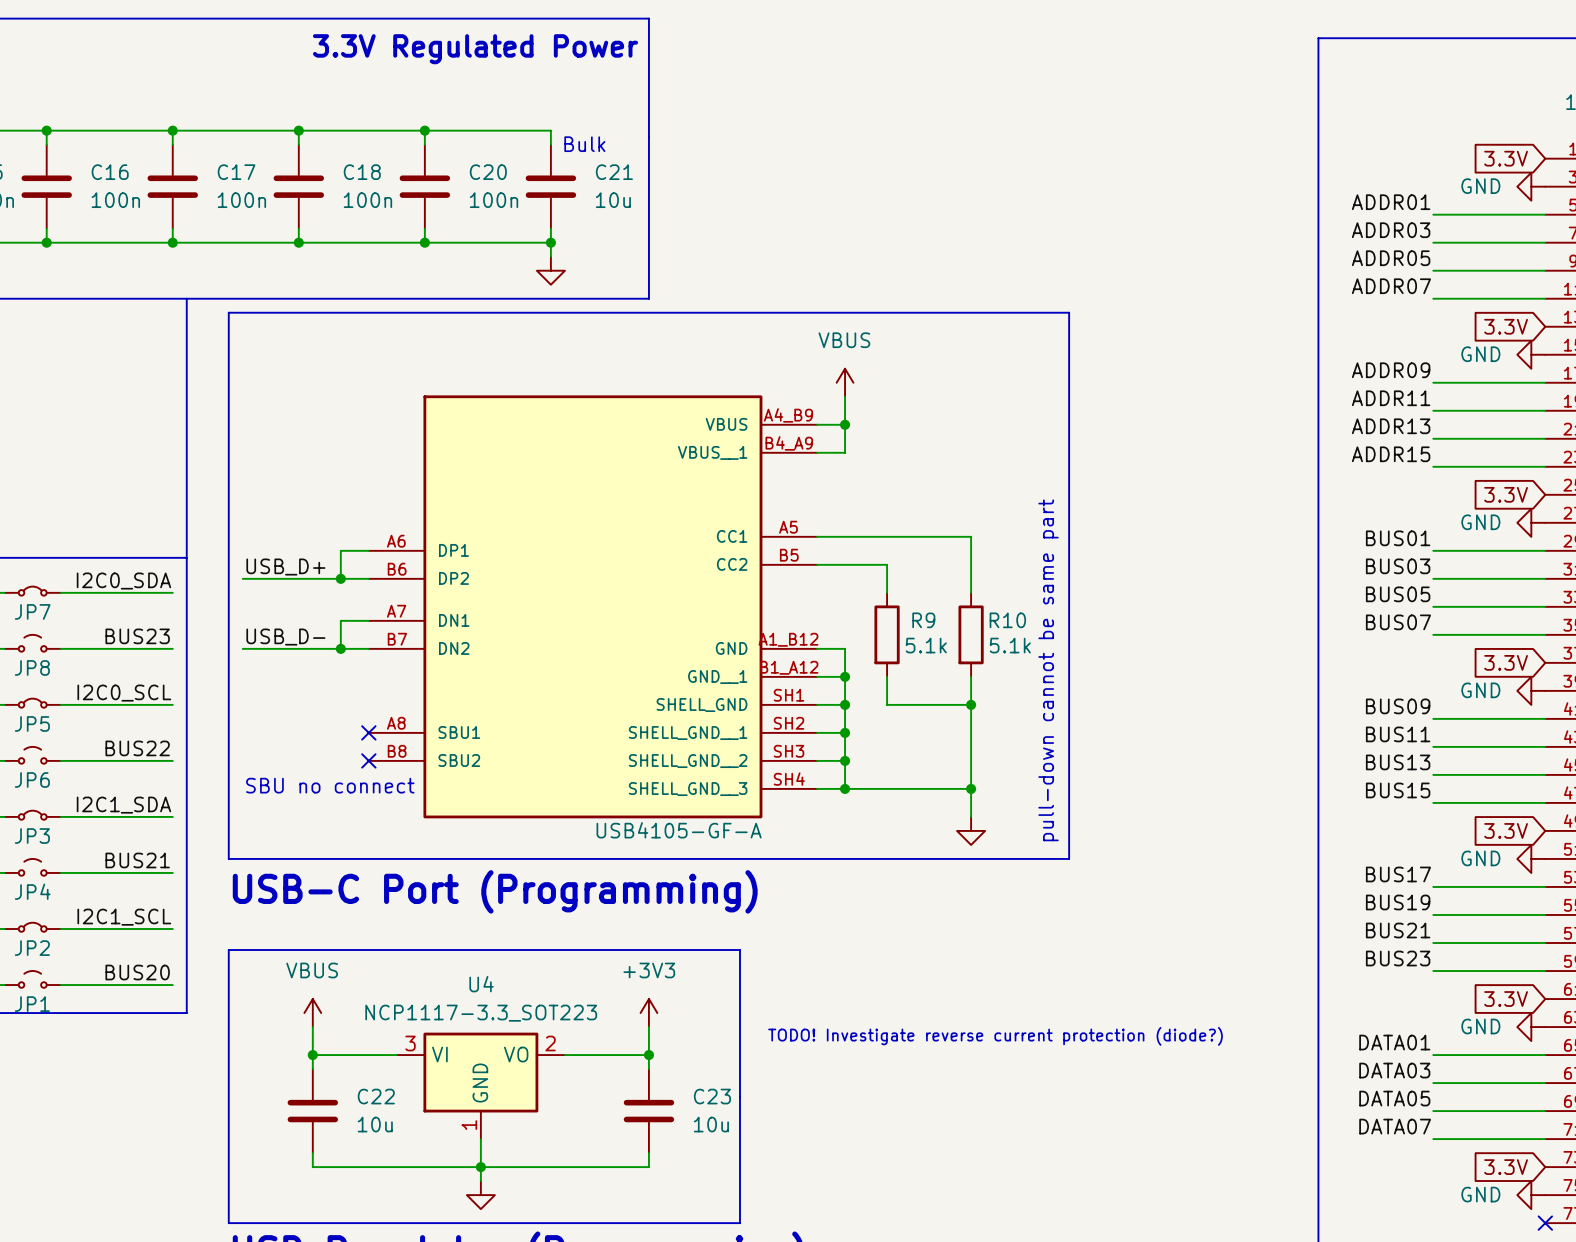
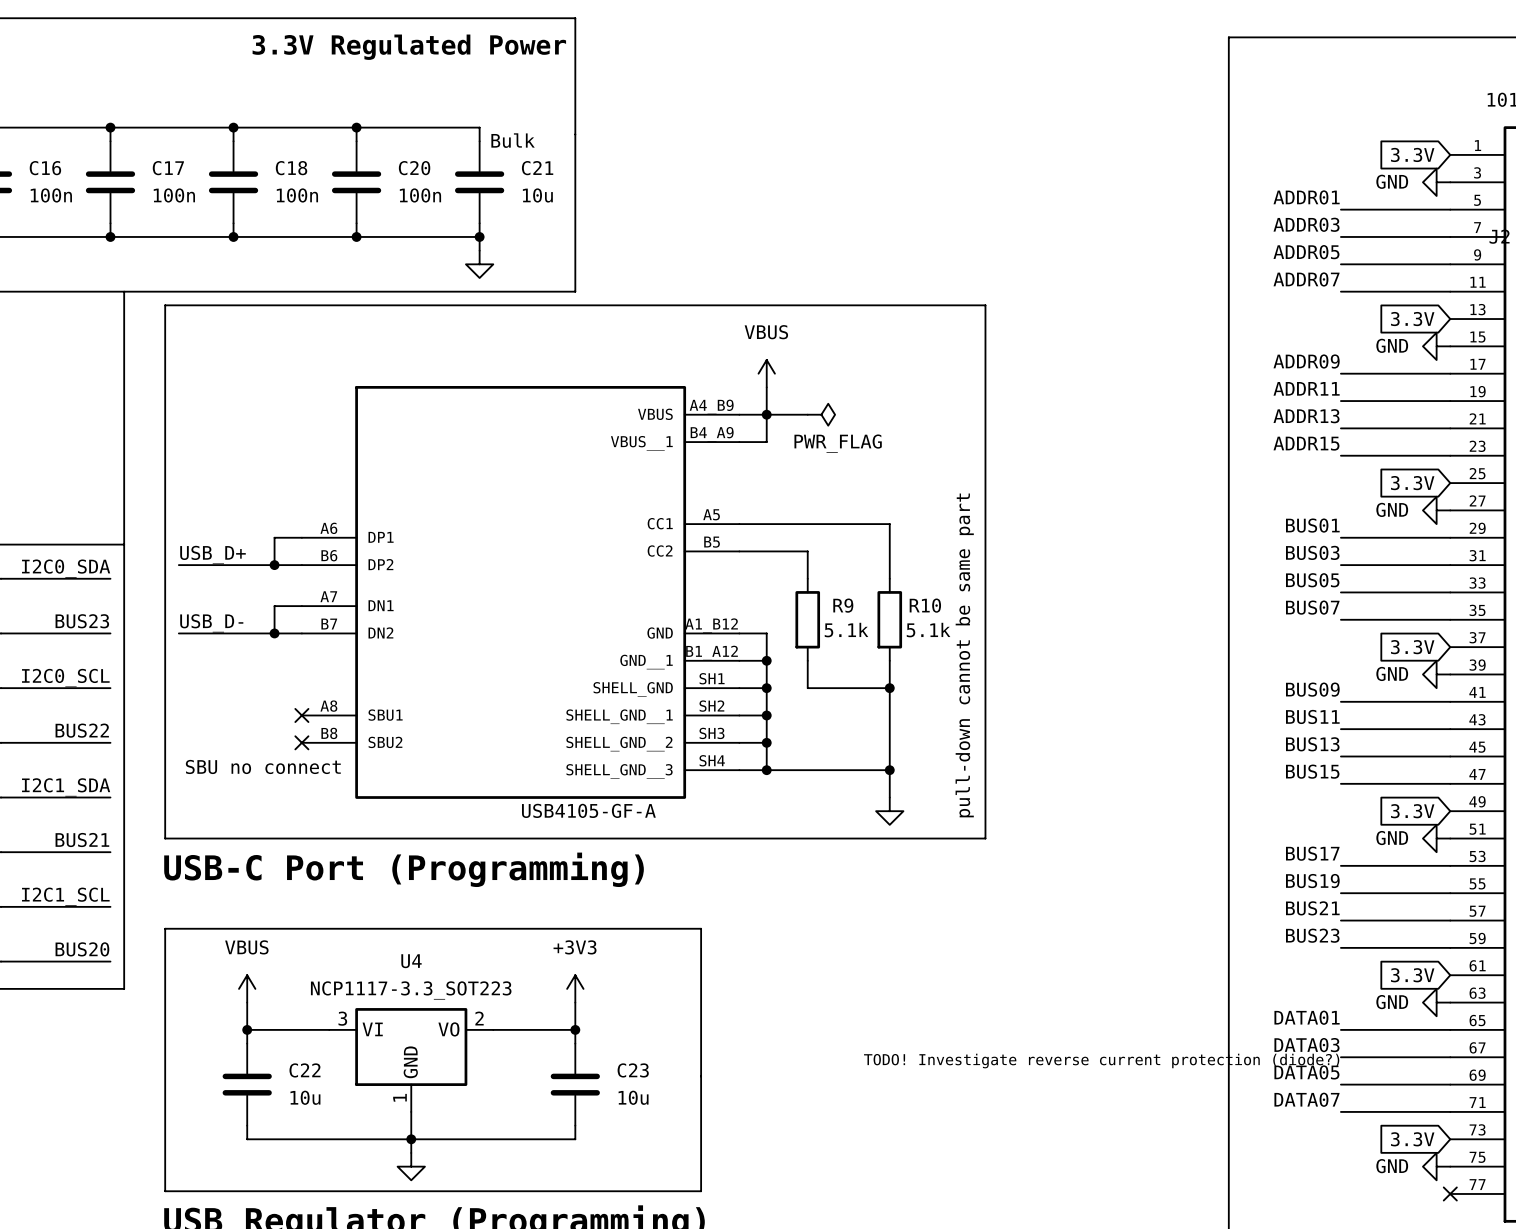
wire: none -> (766, 414) (807, 414)
power symbol: none -> PWR_FLAG (821, 414)
line: (228, 951) (739, 950) (739, 1223) (228, 1223) (228, 1220) -> (165, 928) (701, 928) (701, 1191) (165, 1191)
text position: TODO! Investigate reverse current protection (diode?) (995, 1036) -> TODO! Investigate reverse current protection (diode?) (1101, 1061)

